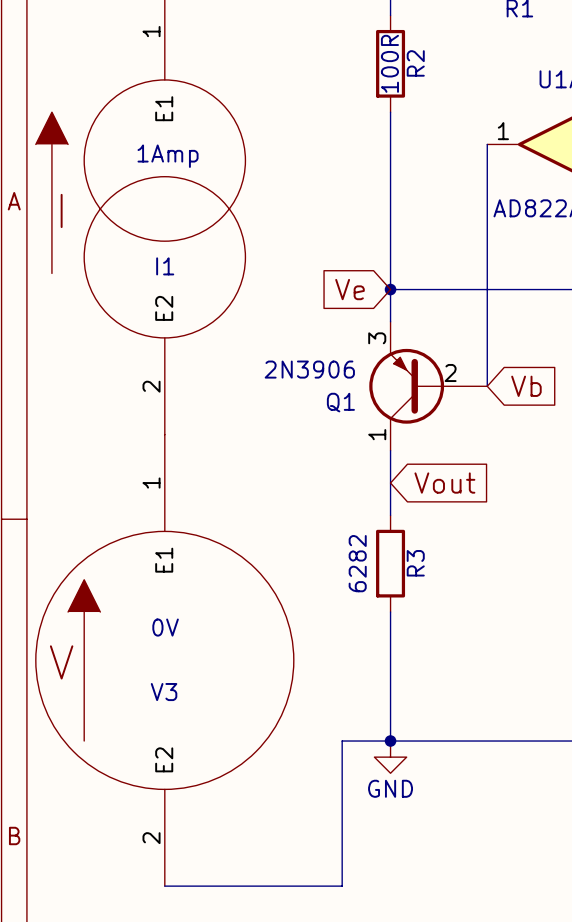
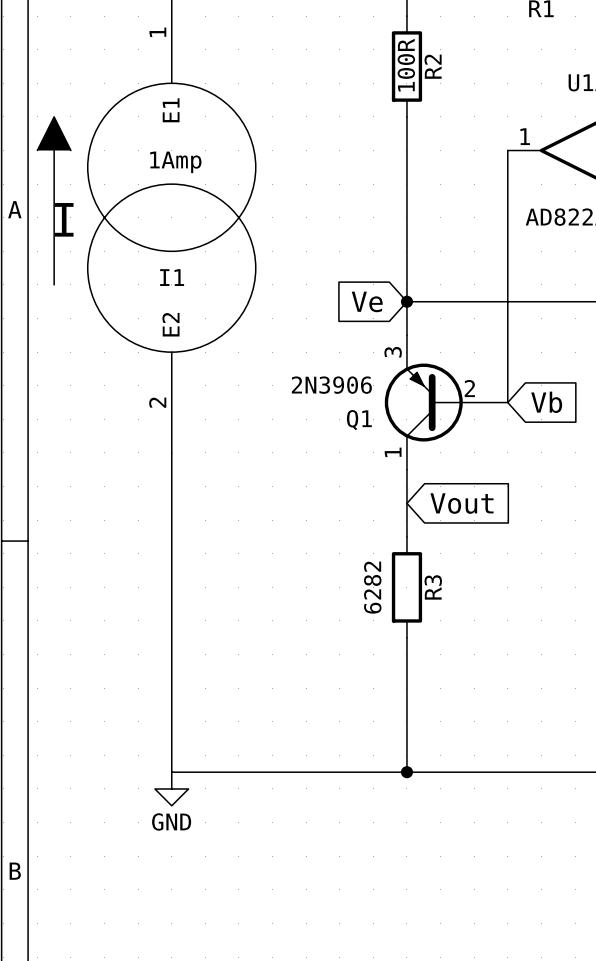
V3: 0V (164, 660) -> none
wire: (342, 741) (342, 886) (164, 886) -> (356, 772) (171, 772) (171, 452)
power symbol position: GND (390, 757) -> GND (171, 788)

